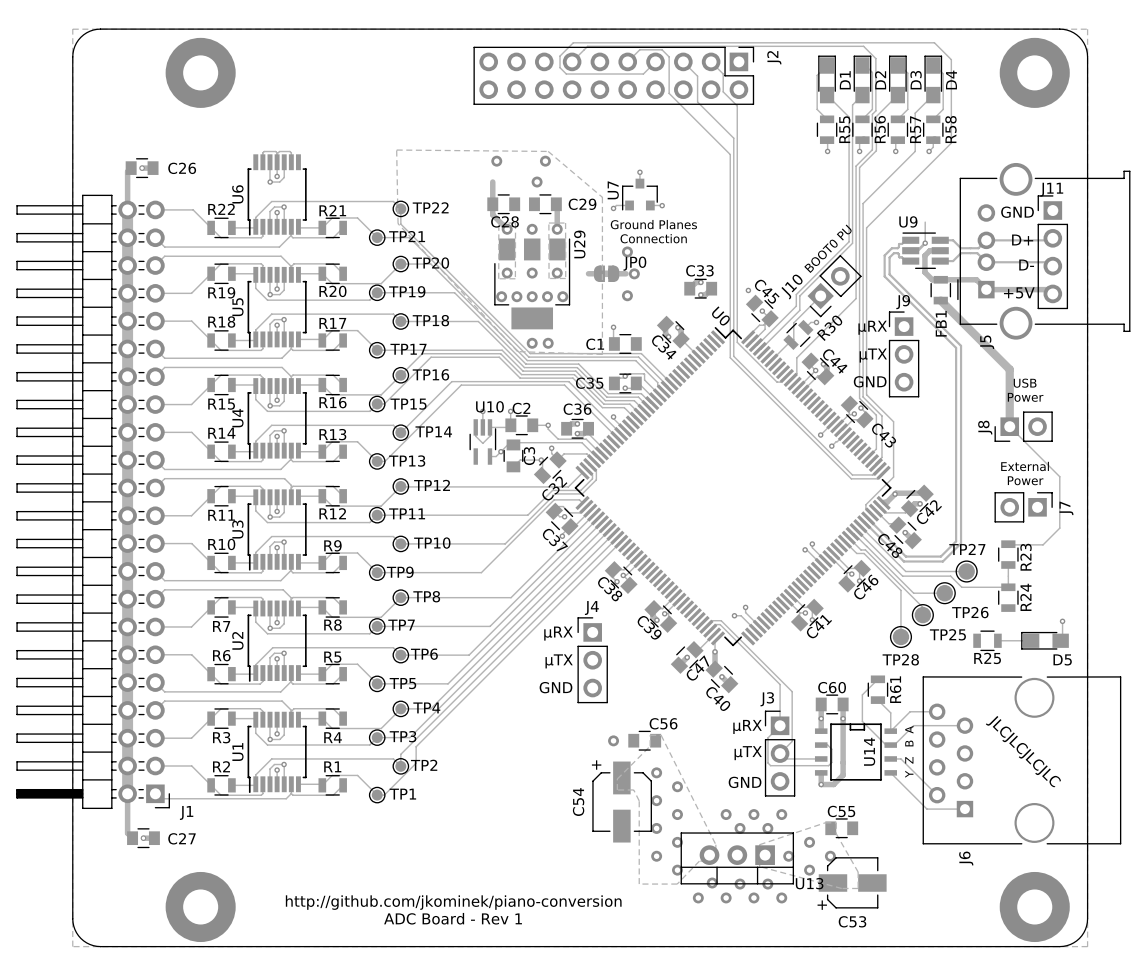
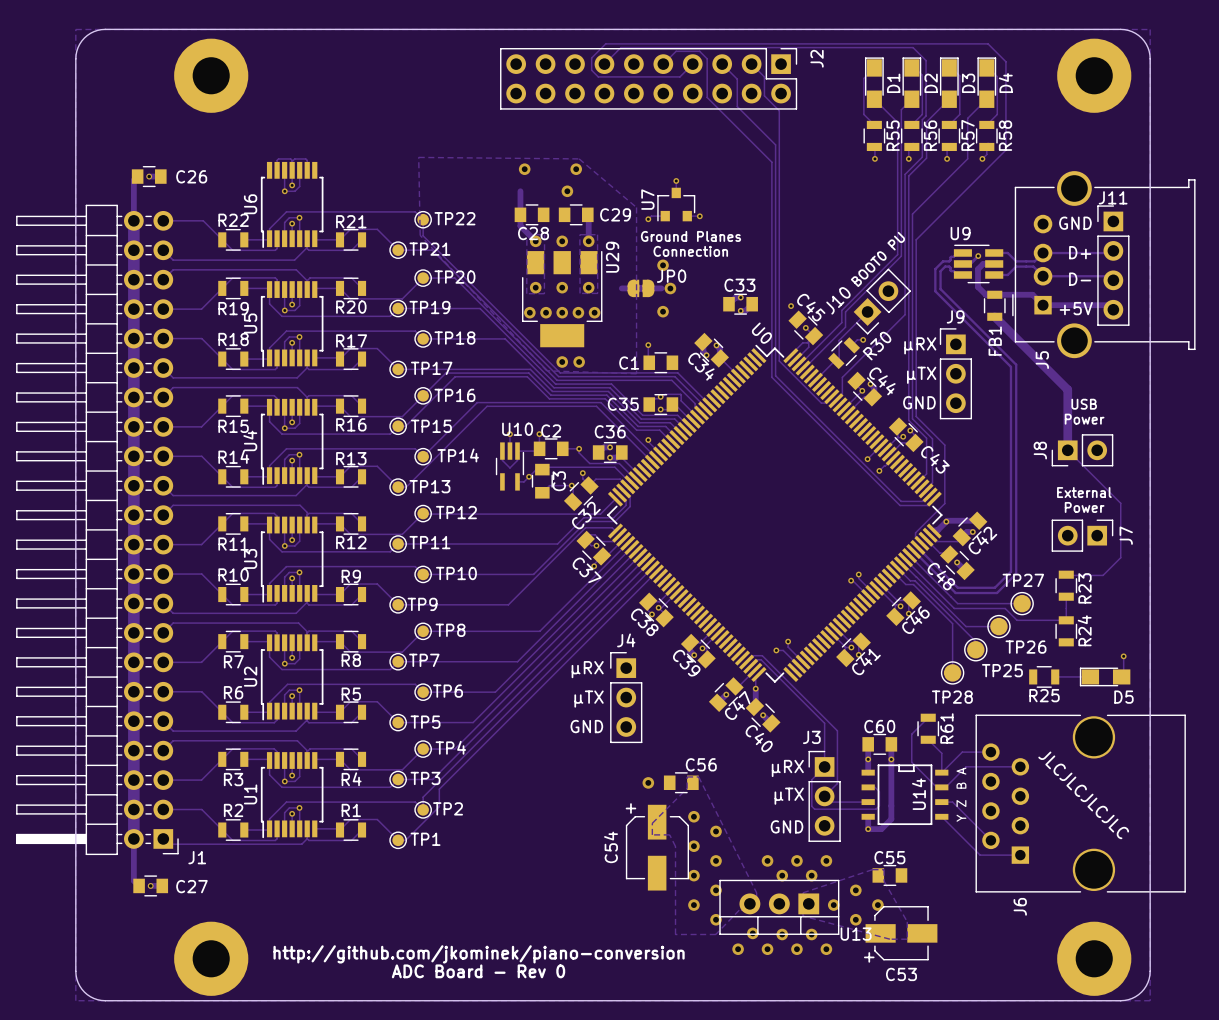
track: (925, 222) (925, 243) -> none
text: ADC Board - Rev 1 (453, 918) -> ADC Board - Rev 0 (478, 971)

